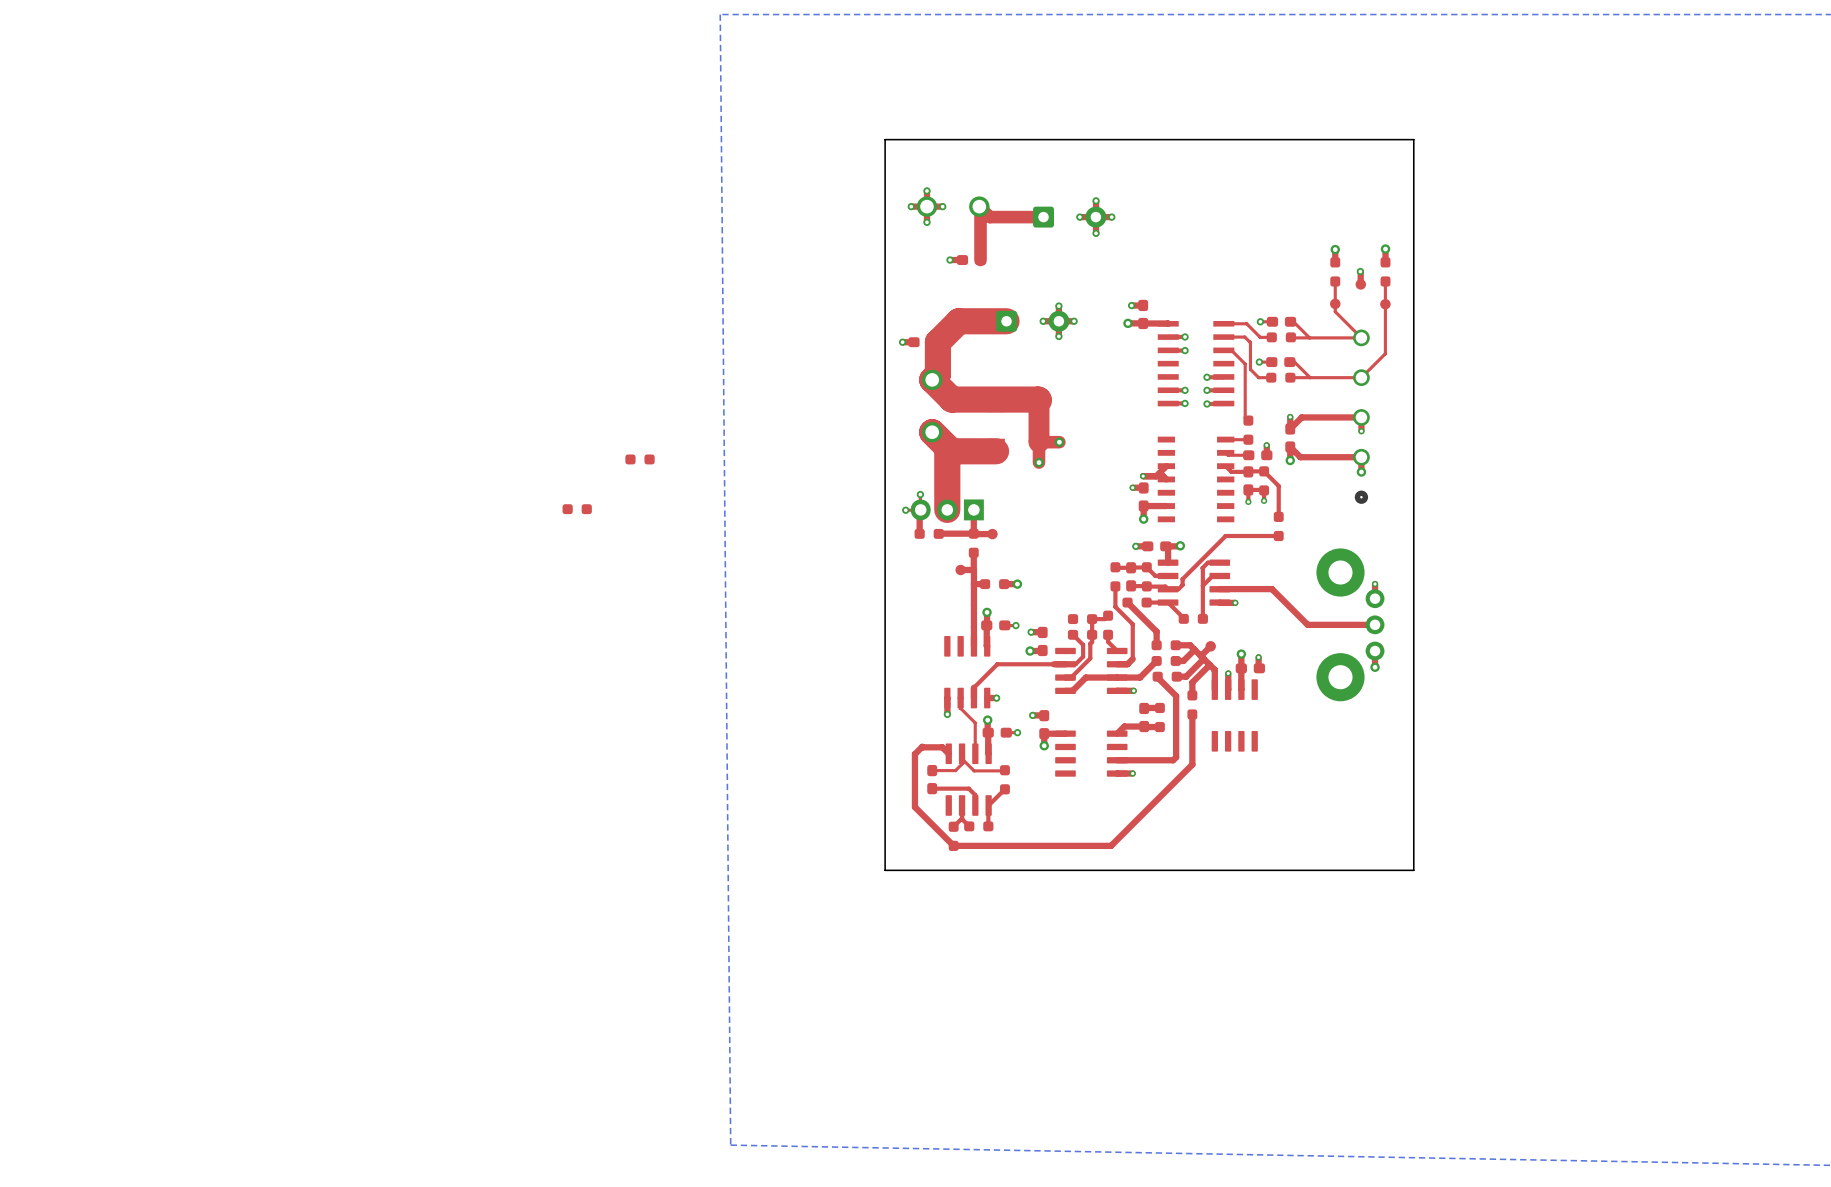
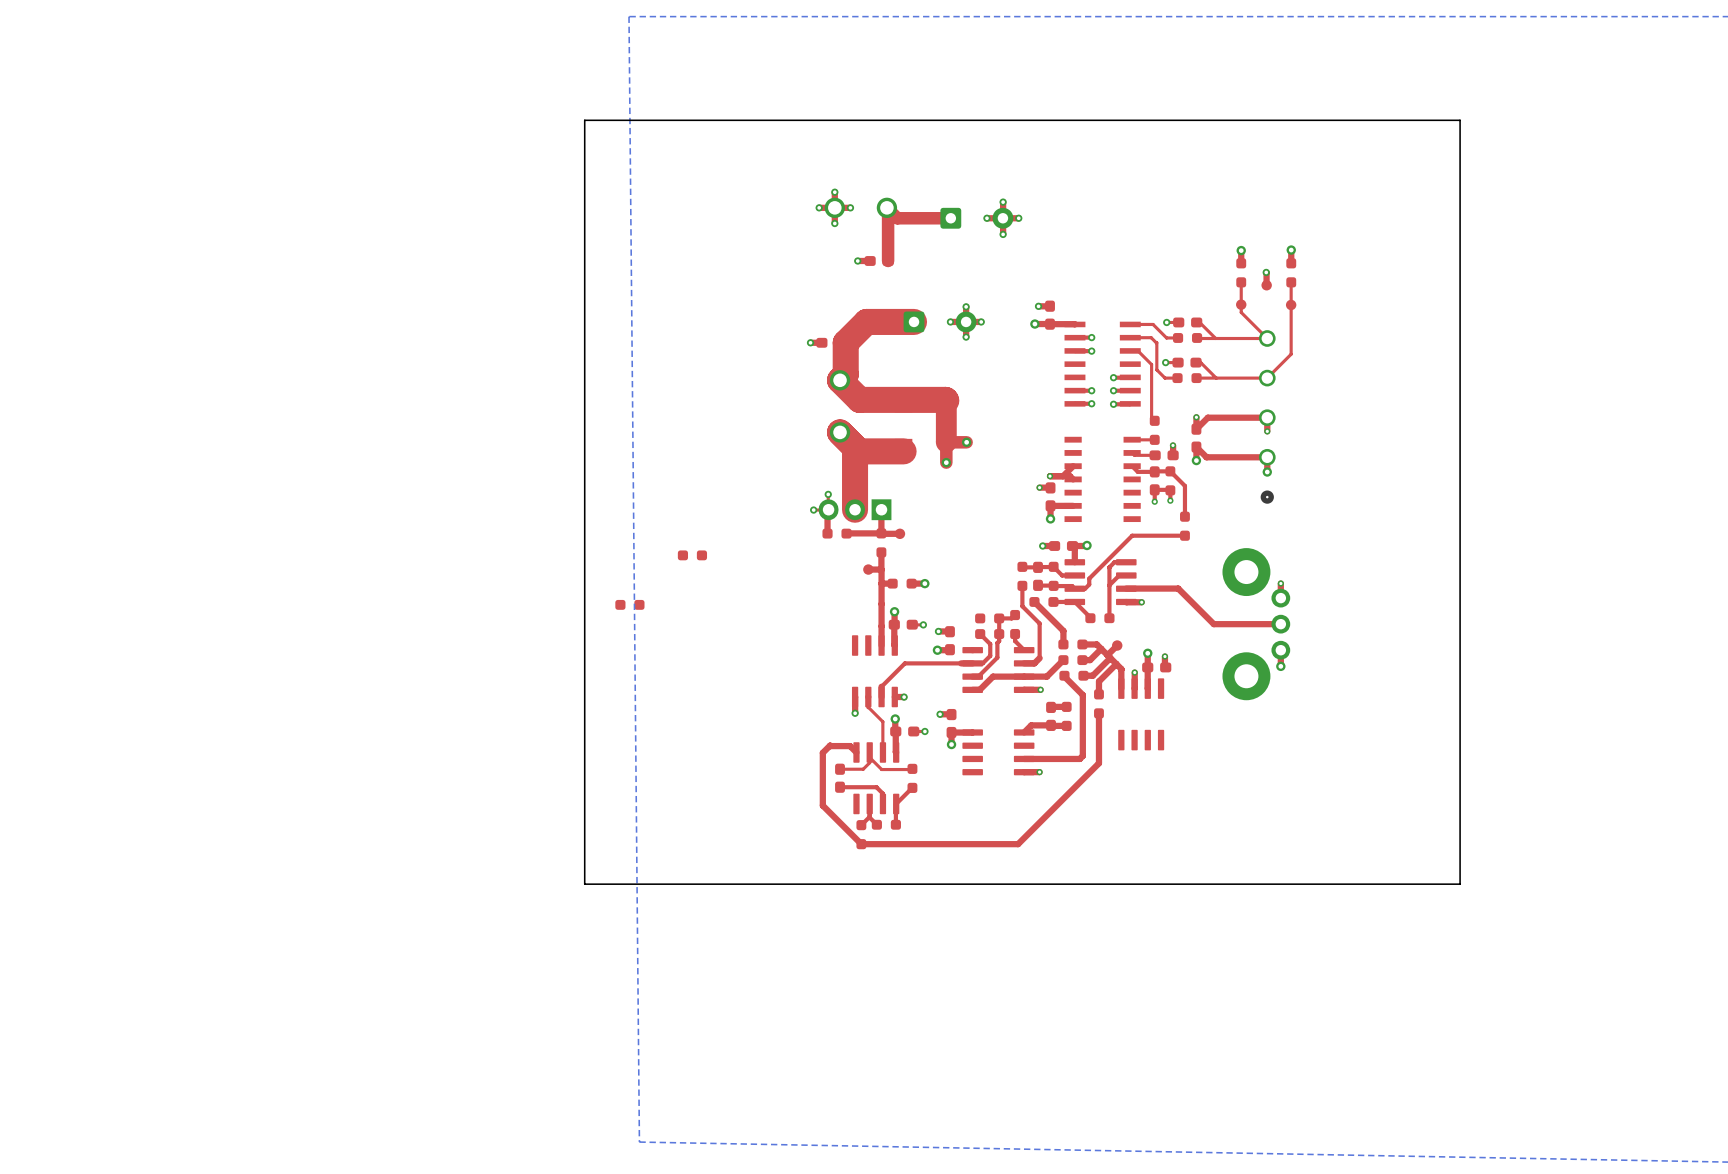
board edge: (1413, 139) (885, 139) (885, 870) (1413, 870) (1413, 139) -> (1460, 120) (1460, 884) (584, 884) (584, 120) (1460, 120)
part: (640, 459) -> none
part: (577, 509) -> none
part: none -> (692, 555)
part: none -> (629, 604)

